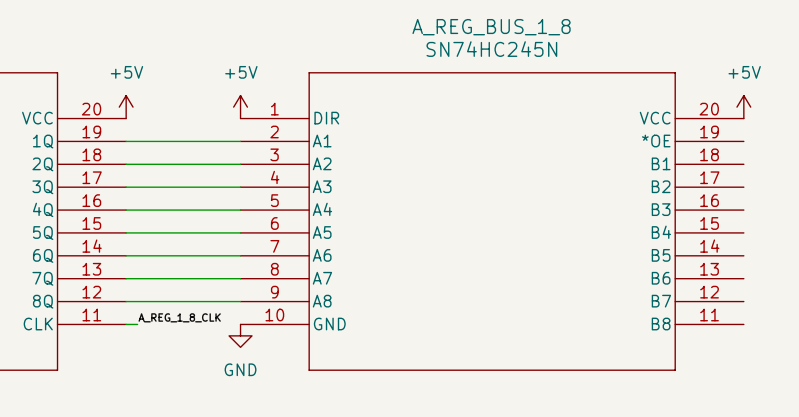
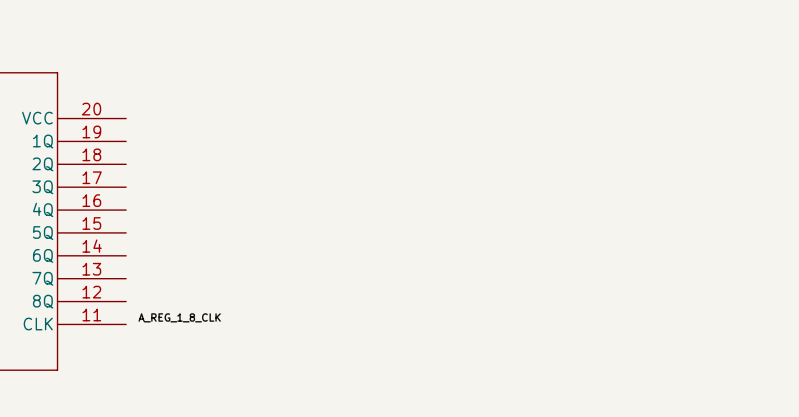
power symbol: +5V (126, 107) -> none
power symbol: +5V (240, 107) -> none
power symbol: +5V (743, 107) -> none
wire: (126, 141) (240, 141) -> none
wire: (126, 164) (240, 164) -> none
wire: (126, 187) (240, 187) -> none
wire: (126, 210) (240, 210) -> none
A_REG_BUS_1_8: SN74HC245N (492, 221) -> none
wire: (126, 232) (240, 232) -> none
wire: (126, 255) (240, 255) -> none
wire: (126, 278) (240, 278) -> none
wire: (126, 301) (240, 301) -> none
wire: (126, 324) (137, 324) -> none
power symbol: GND (240, 335) -> none

